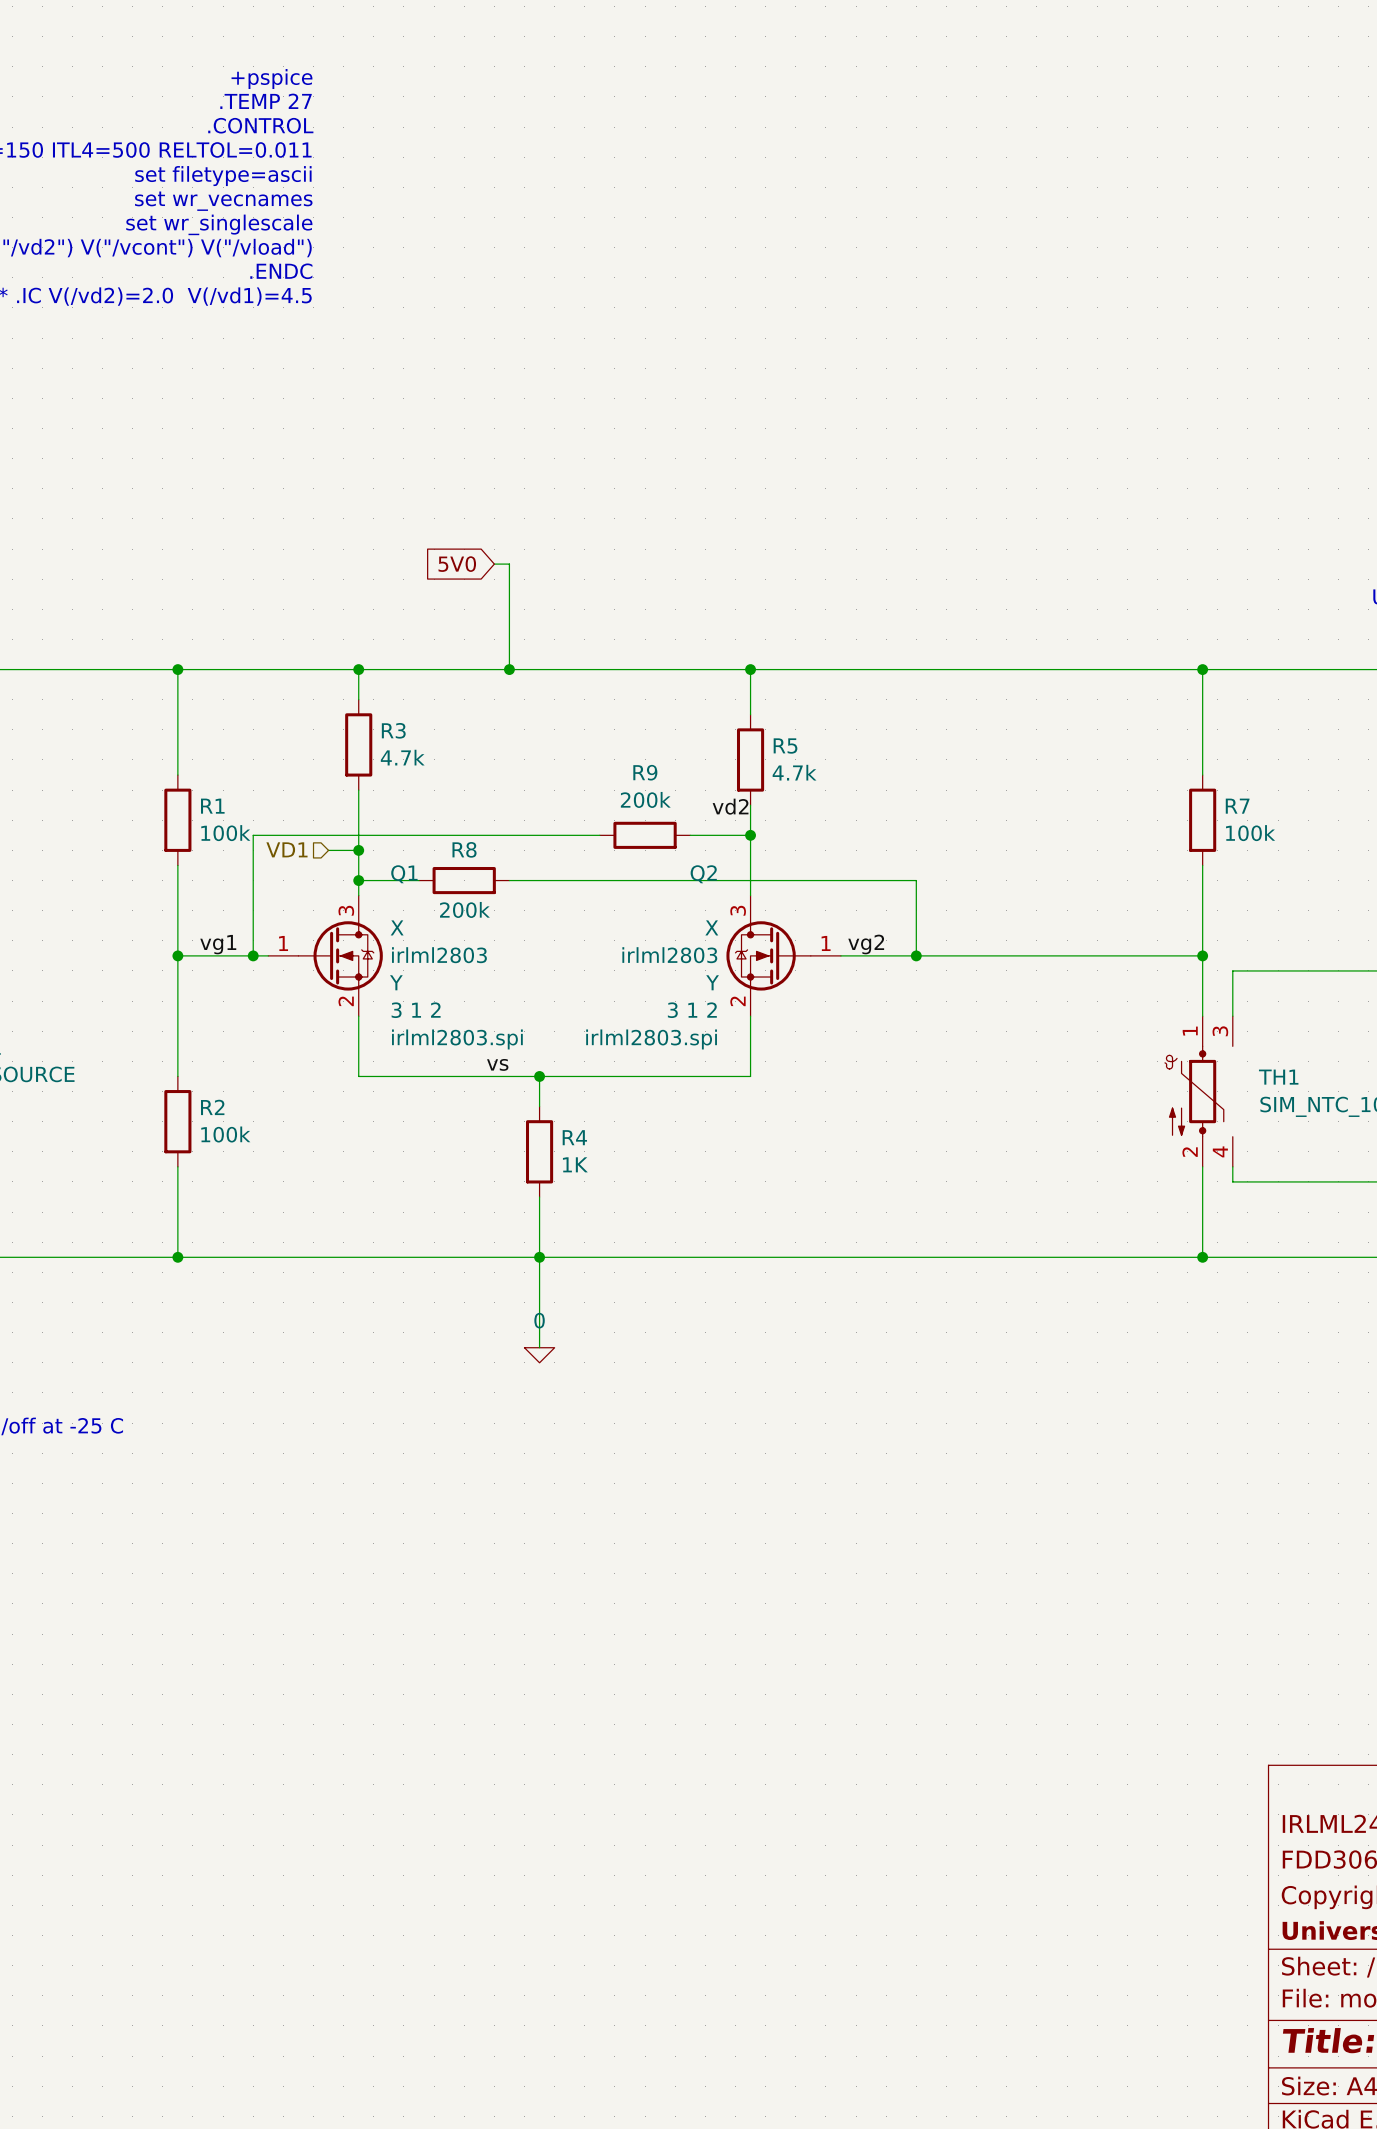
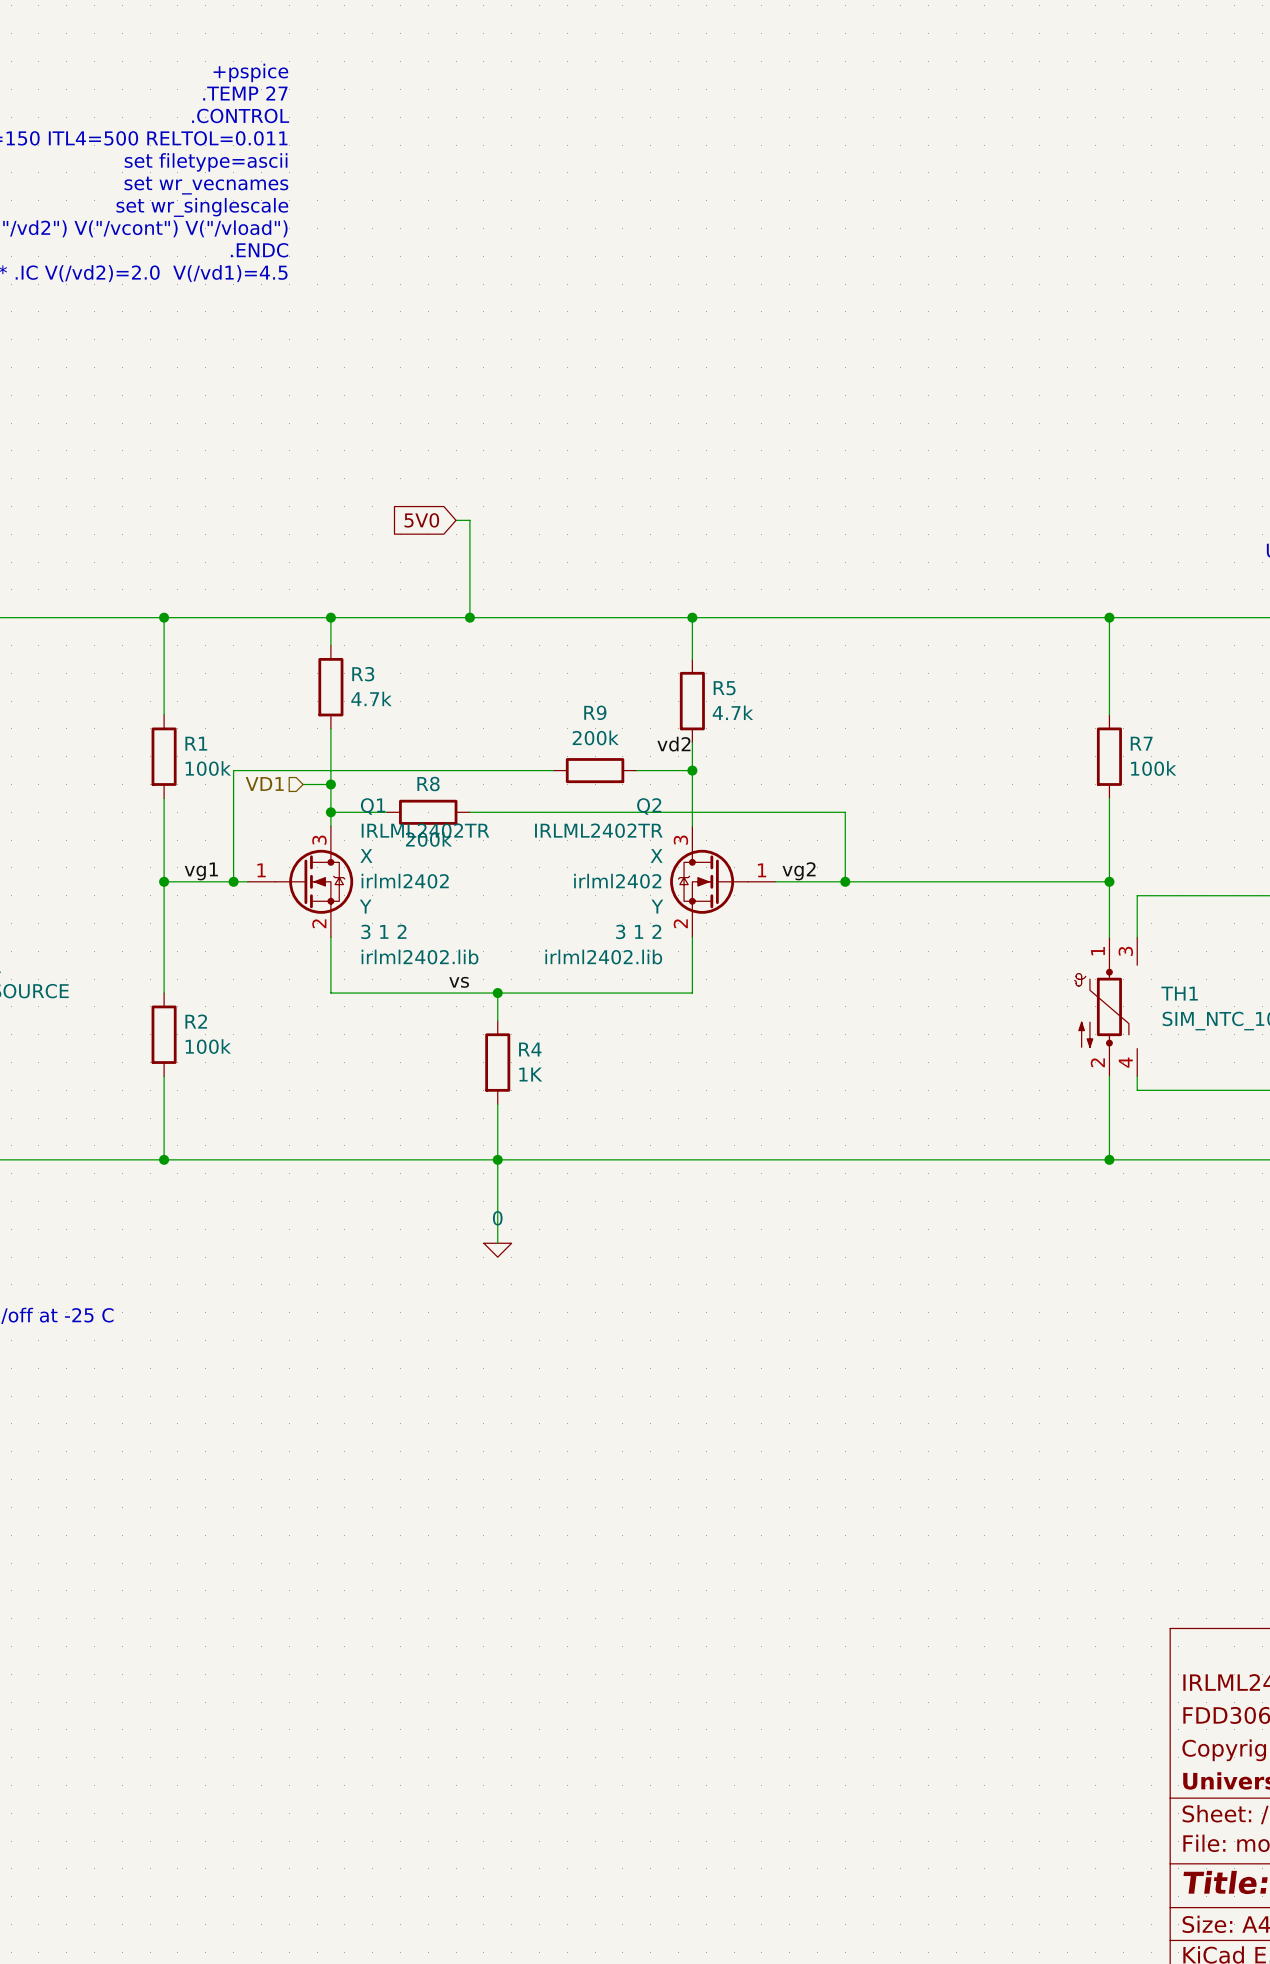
Q1 value: none -> IRLML2402TR (425, 830)
Q2 value: none -> IRLML2402TR (598, 830)
Q1 text: irlml2803 (439, 955) -> irlml2402 (405, 881)
Q2 text: irlml2803 (669, 955) -> irlml2402 (617, 881)
Q1 text: irlml2803.spi (457, 1039) -> irlml2402.lib (420, 957)
Q2 text: irlml2803.spi (651, 1039) -> irlml2402.lib (603, 957)

